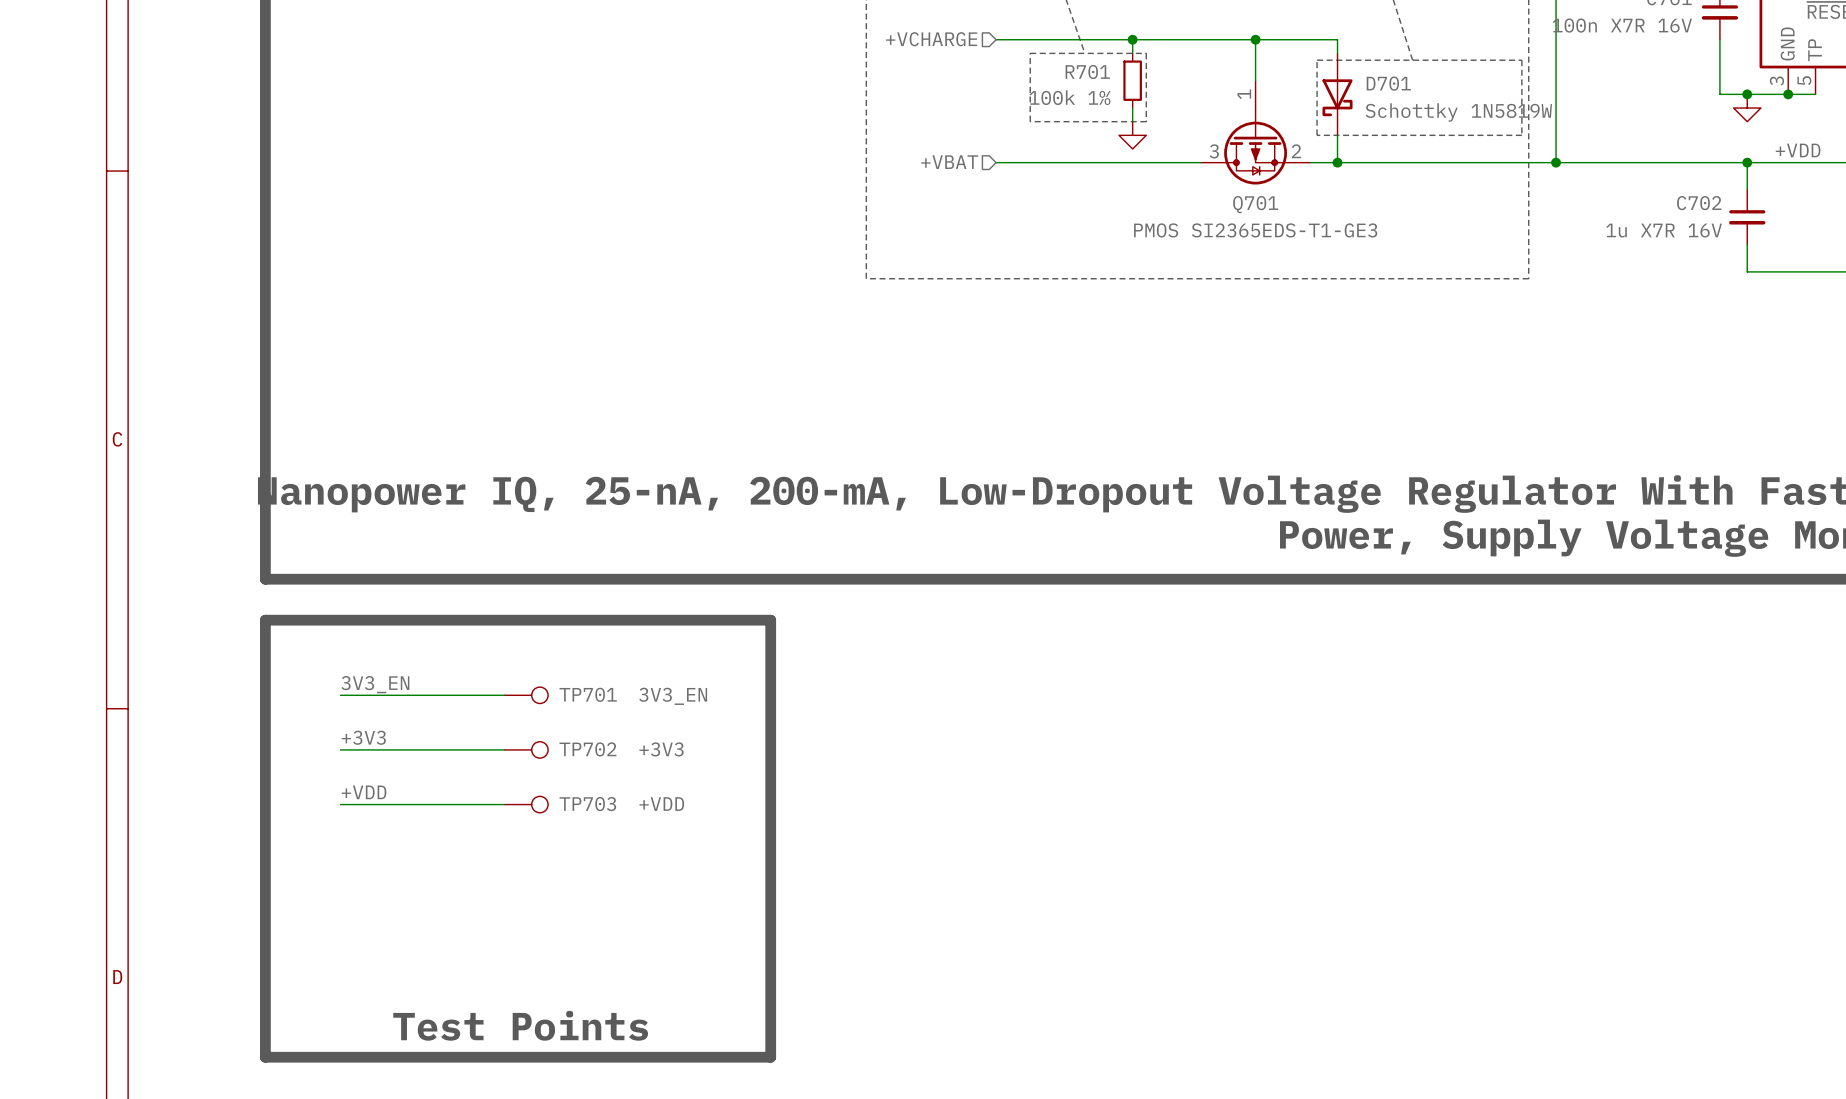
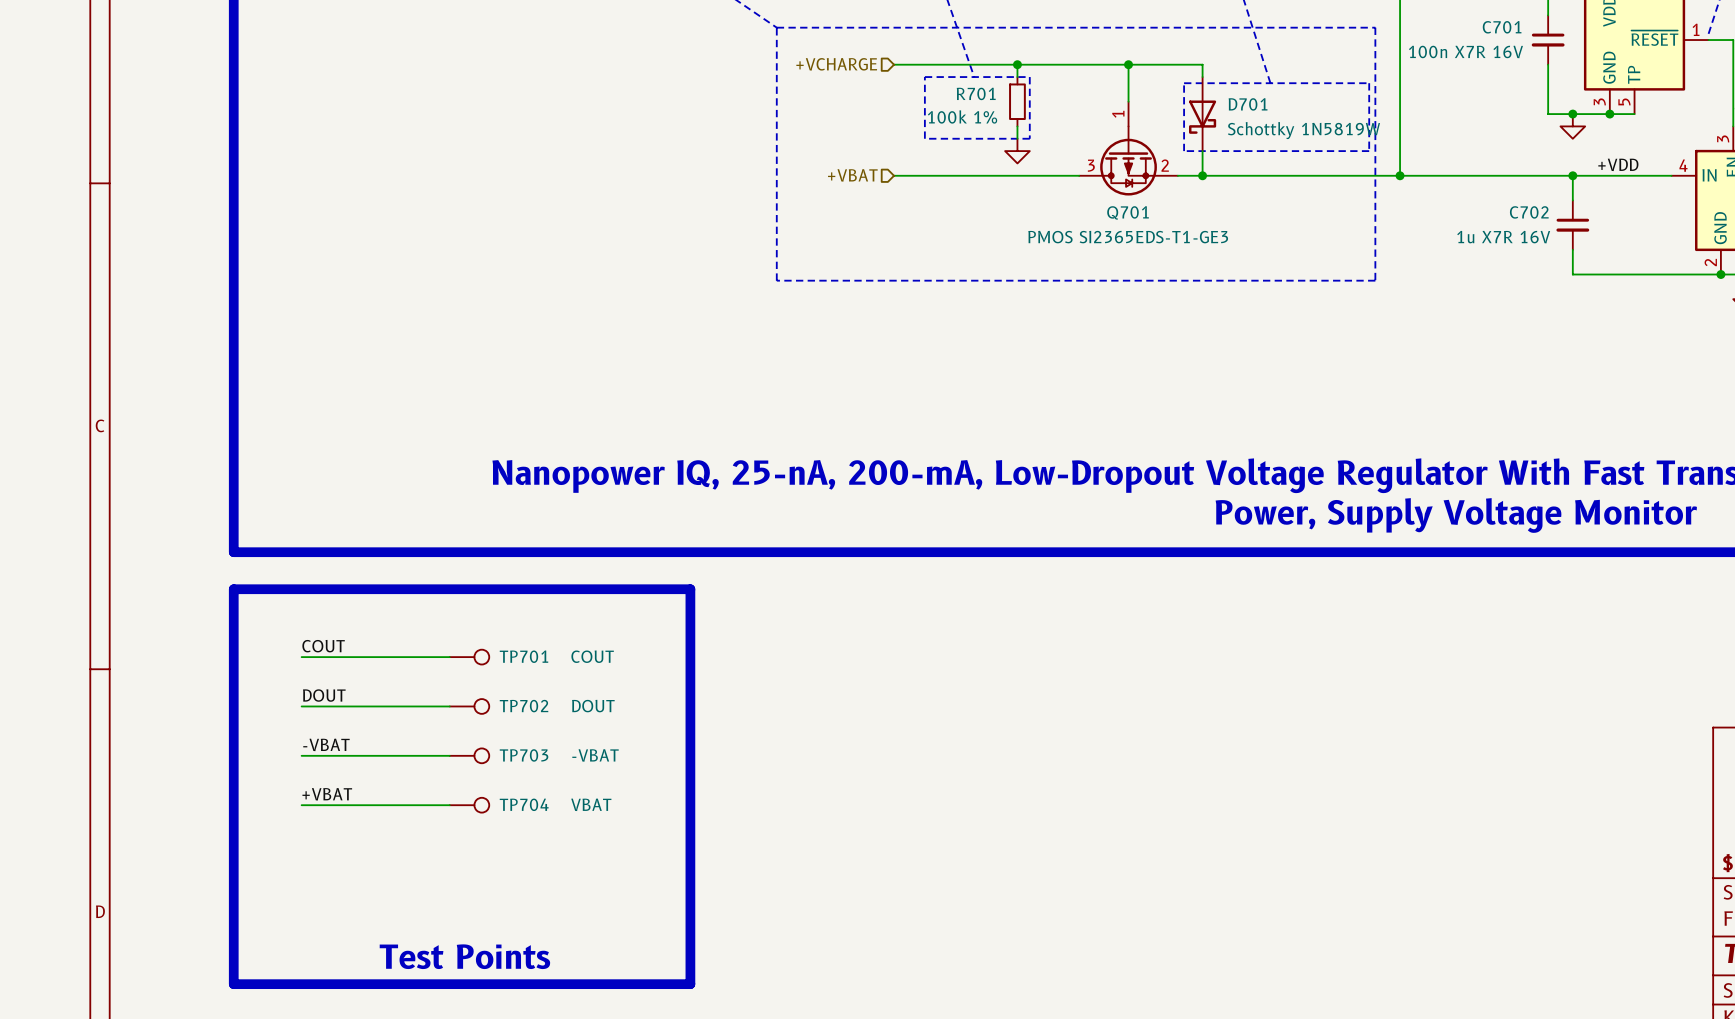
label: 3V3_EN (375, 684) -> COUT (323, 646)
TP701 value: 3V3_EN (673, 696) -> COUT (592, 656)
label: +3V3 (363, 737) -> DOUT (324, 695)
TP702 value: +3V3 (661, 749) -> DOUT (593, 706)
label: +VDD (364, 792) -> -VBAT (326, 744)
TP703 value: +VDD (661, 804) -> -VBAT (595, 755)
label: none -> +VBAT (327, 794)
wire: none -> (301, 805) (449, 805)
TP704: none -> VBAT (469, 805)

